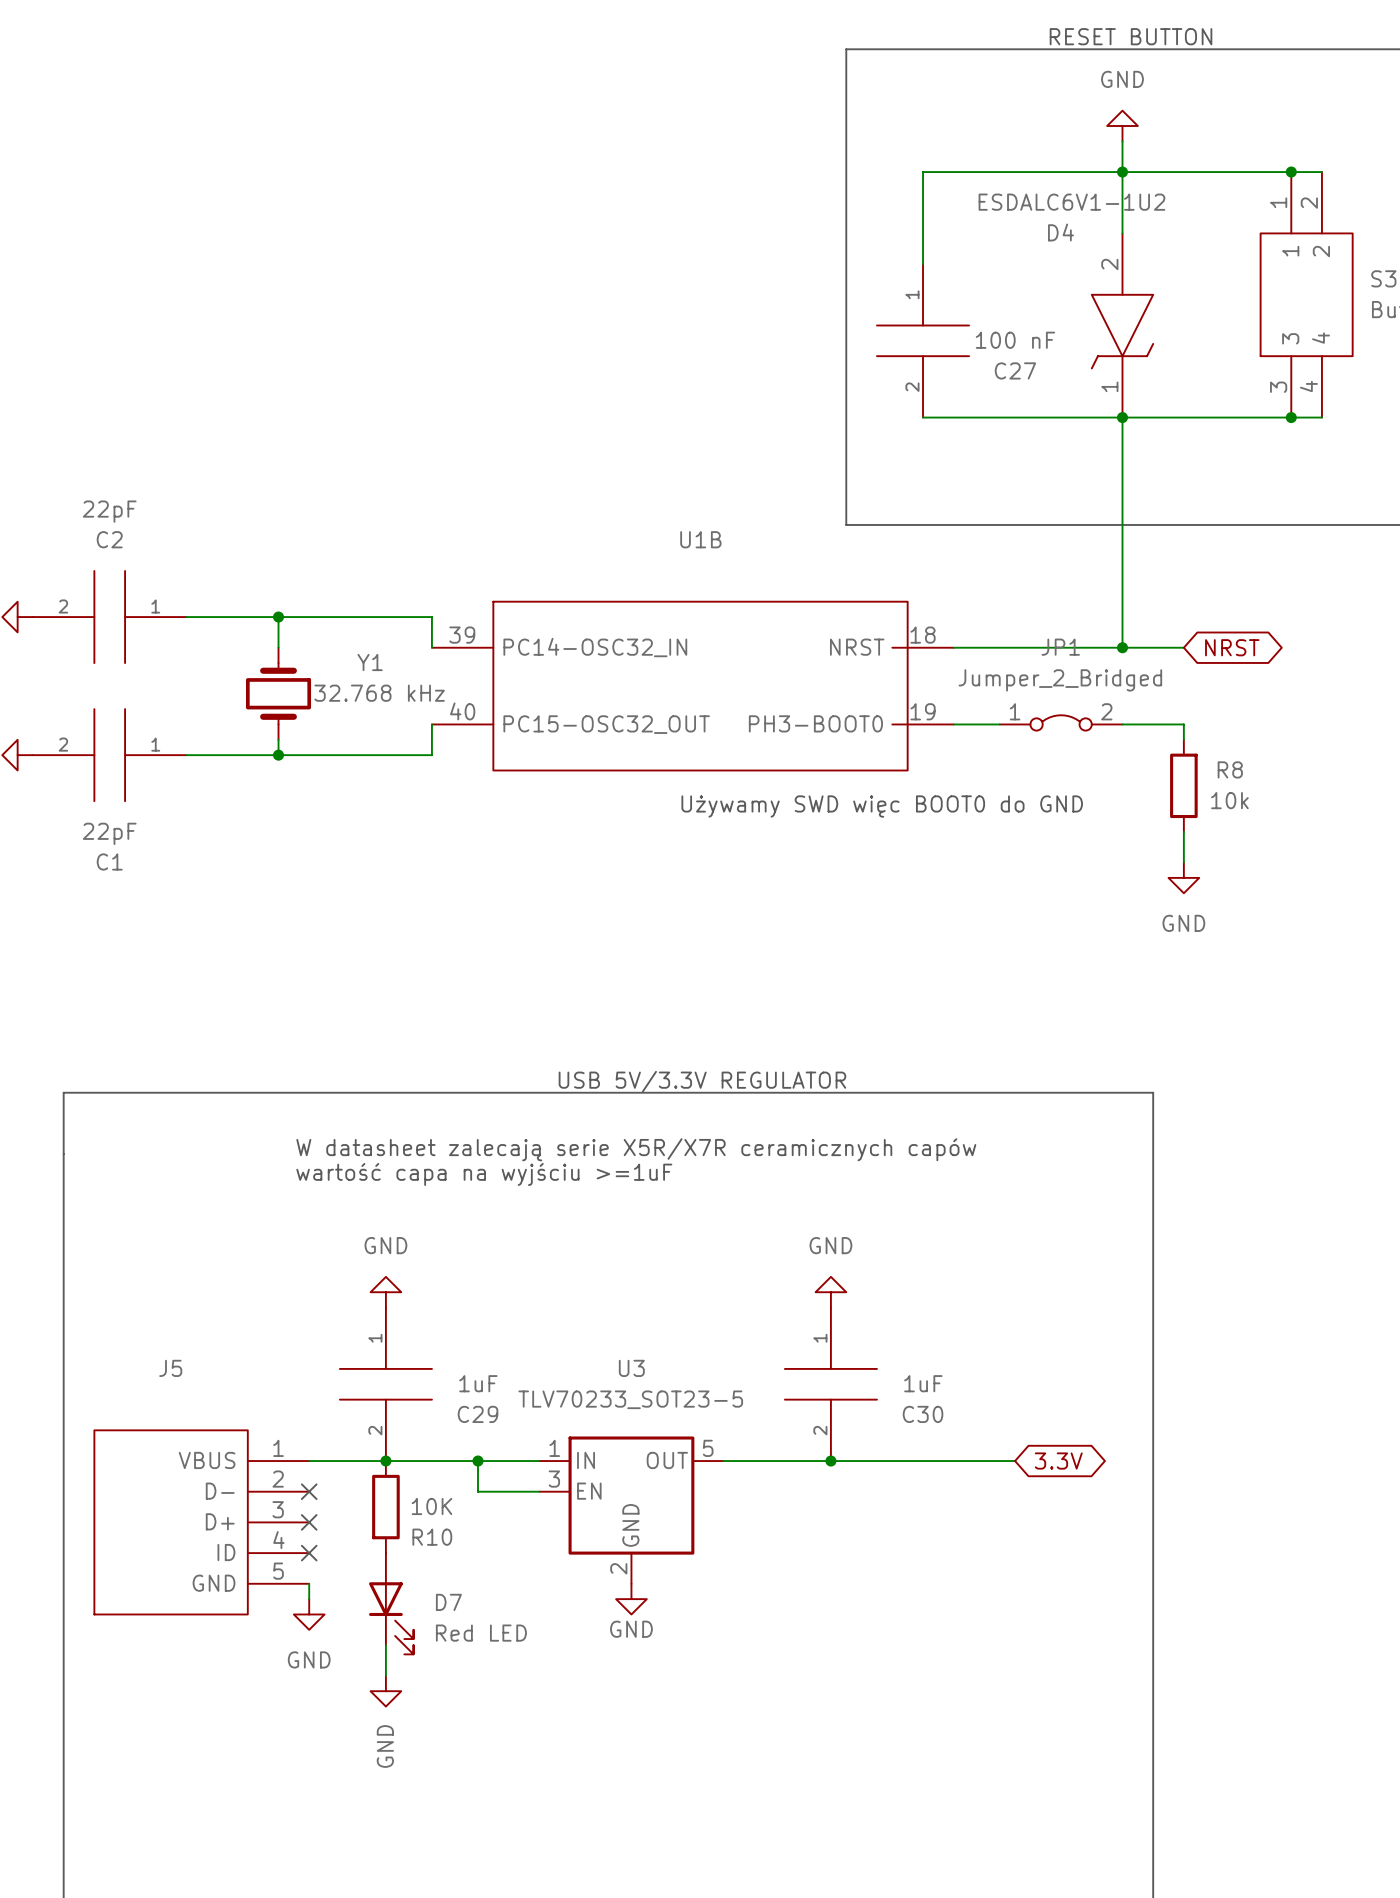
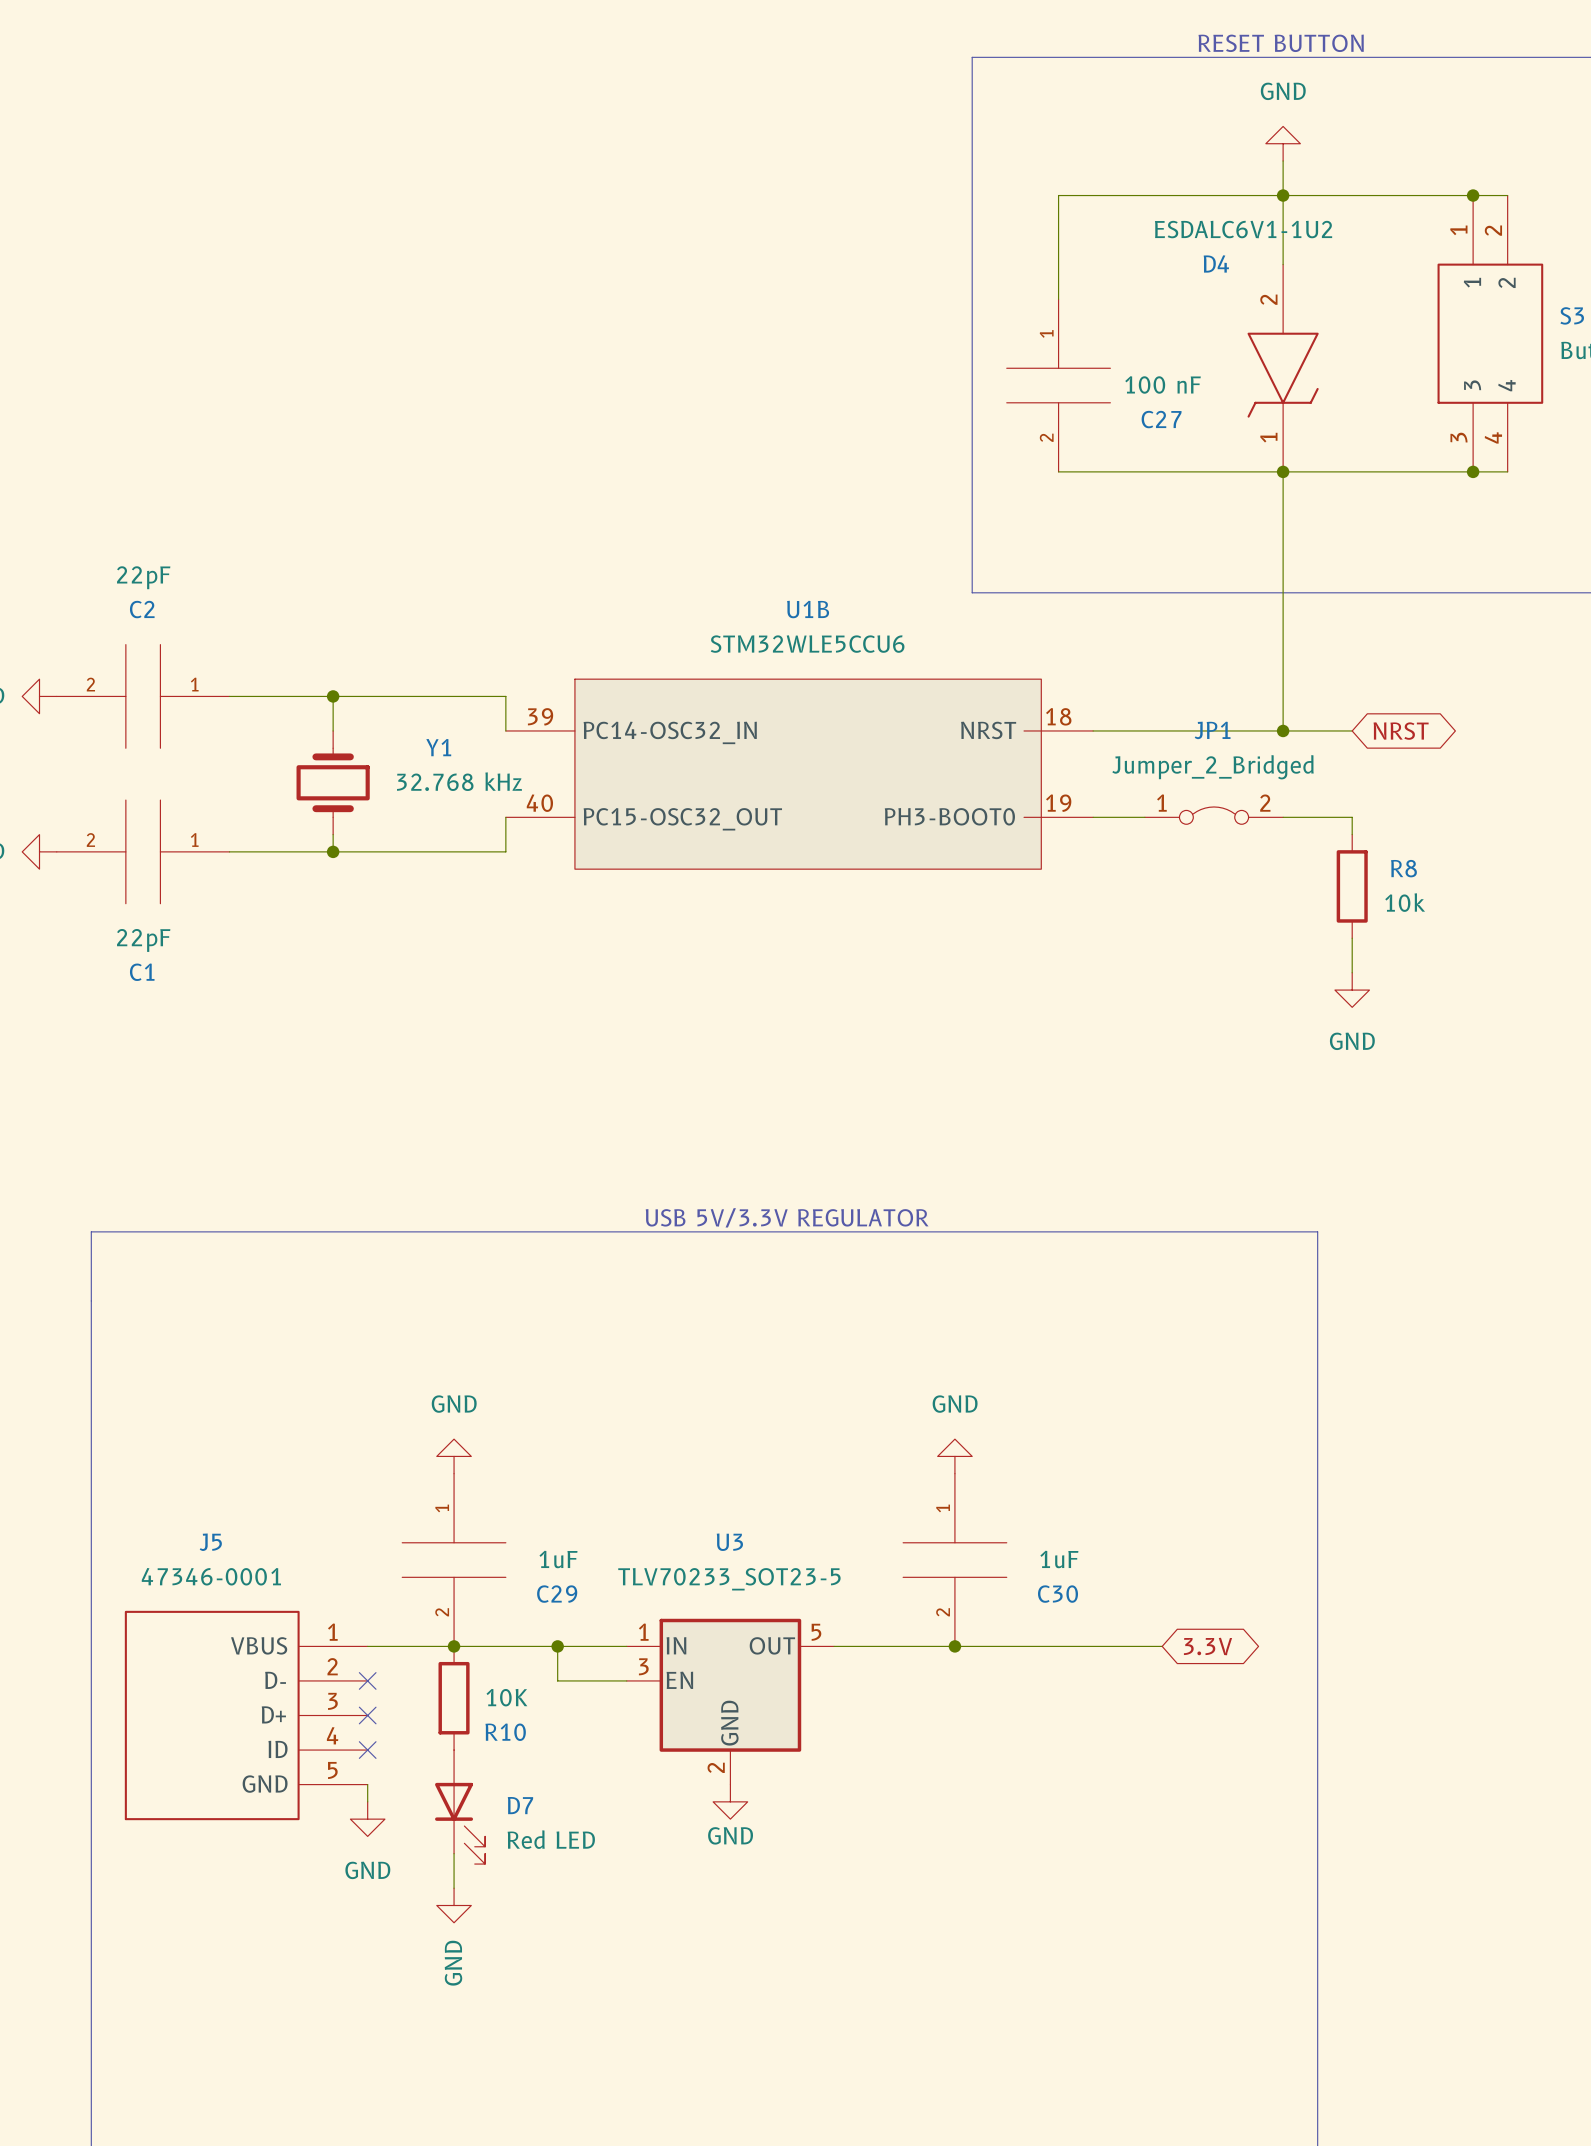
U1B value: none -> STM32WLE5CCU6 (807, 644)
text: Używamy SWD więc BOOT0 do GND (882, 806) -> none
text: W datasheet zalecają serie X5R/X7R ceramicznych capów (636, 1149) -> none
text: wartość capa na wyjściu >=1uF (484, 1174) -> none
J5 value: none -> 47346-0001 (211, 1576)

